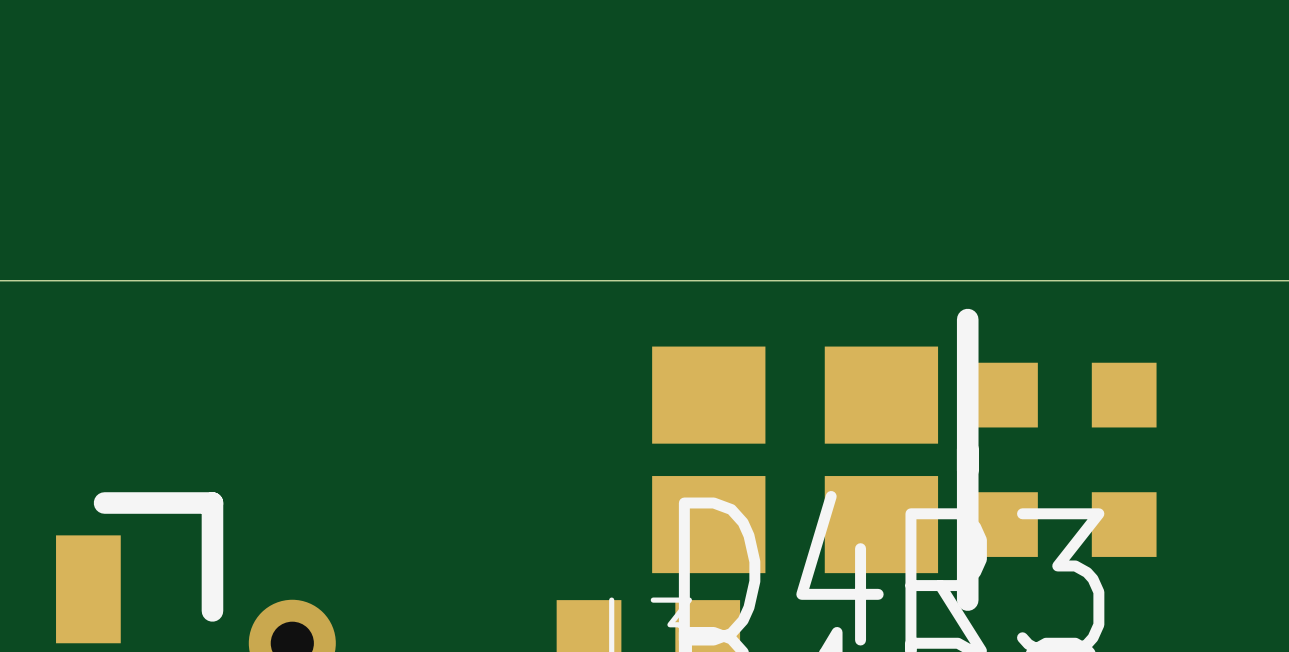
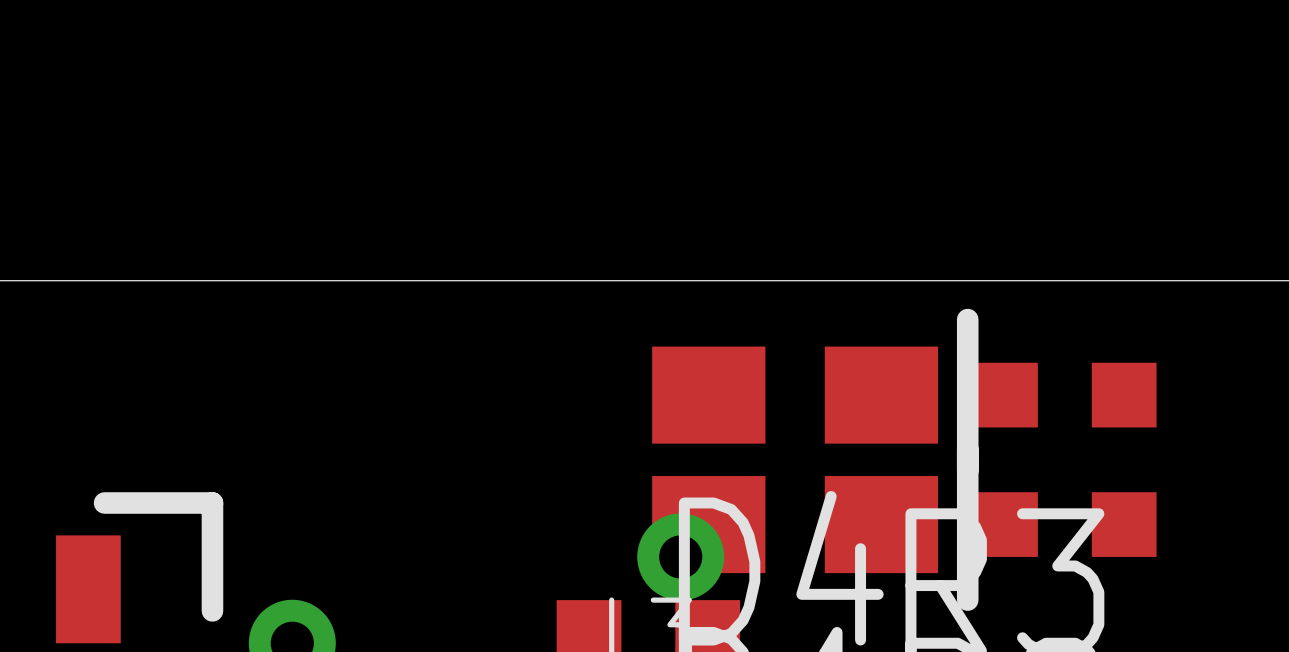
via: none -> (680, 556)

